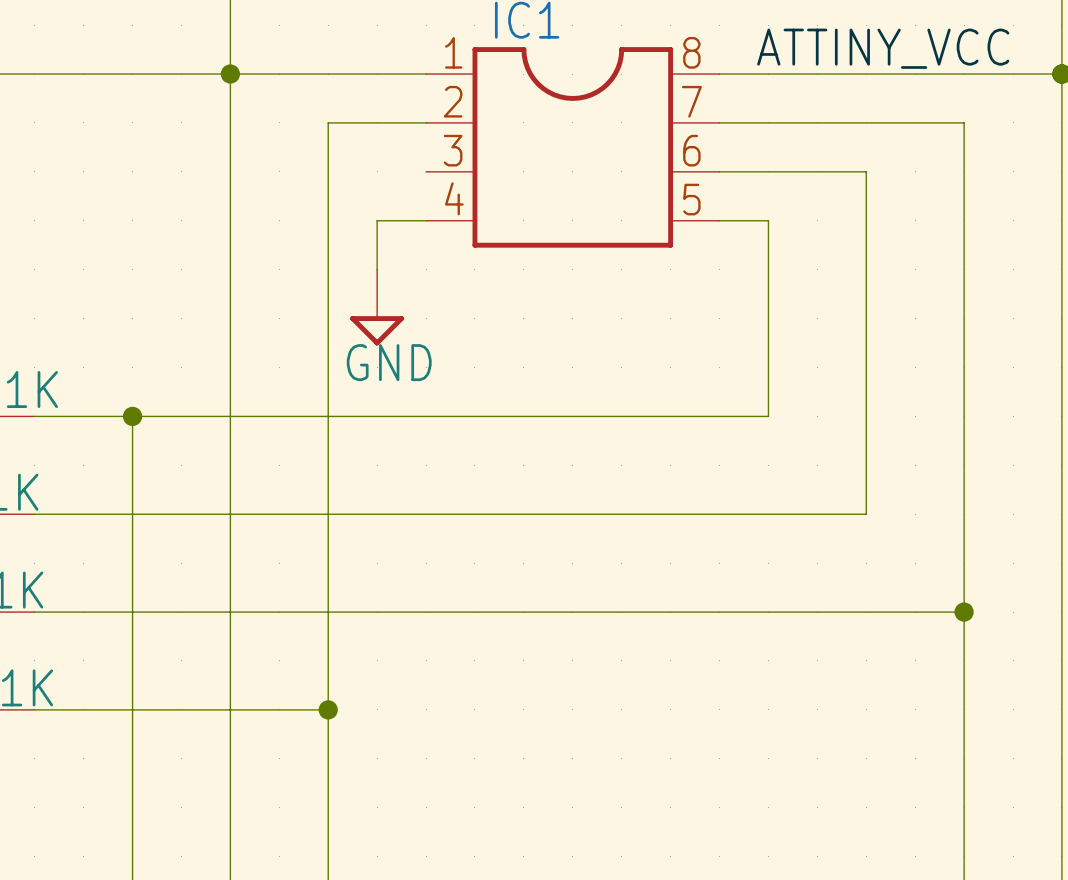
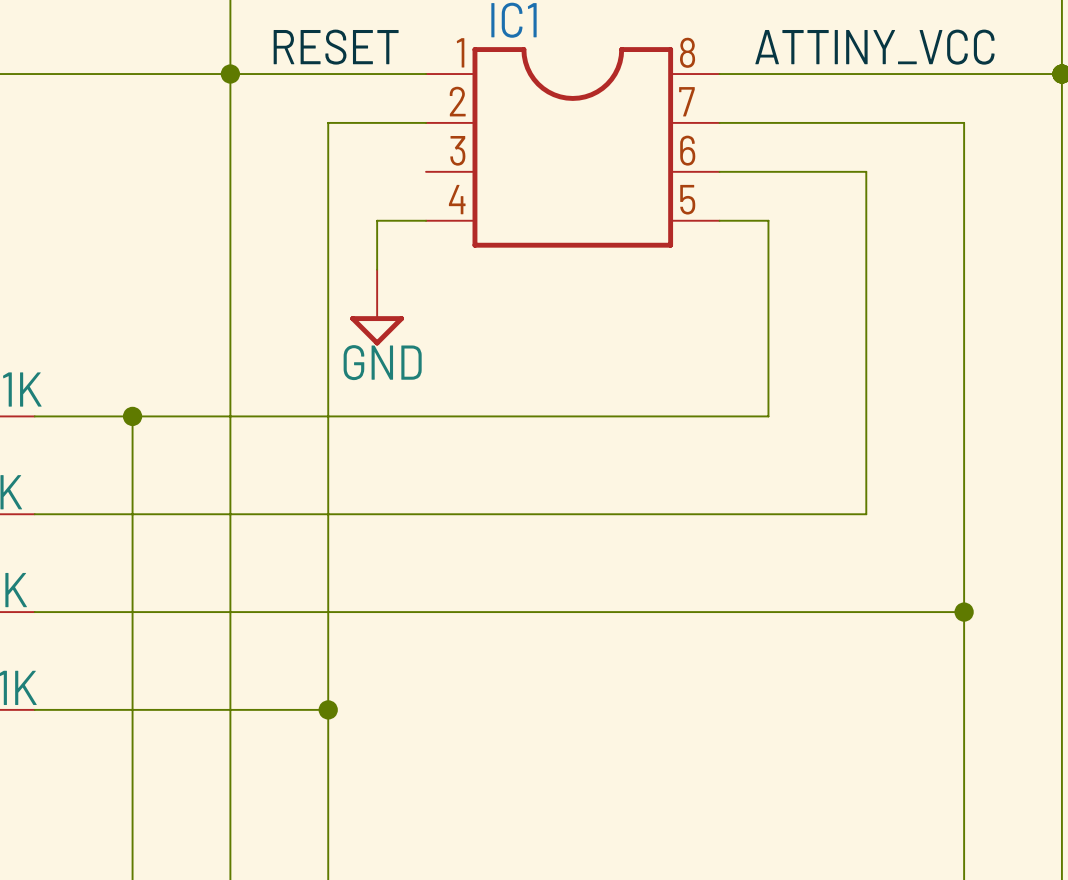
label: none -> RESET (336, 47)

